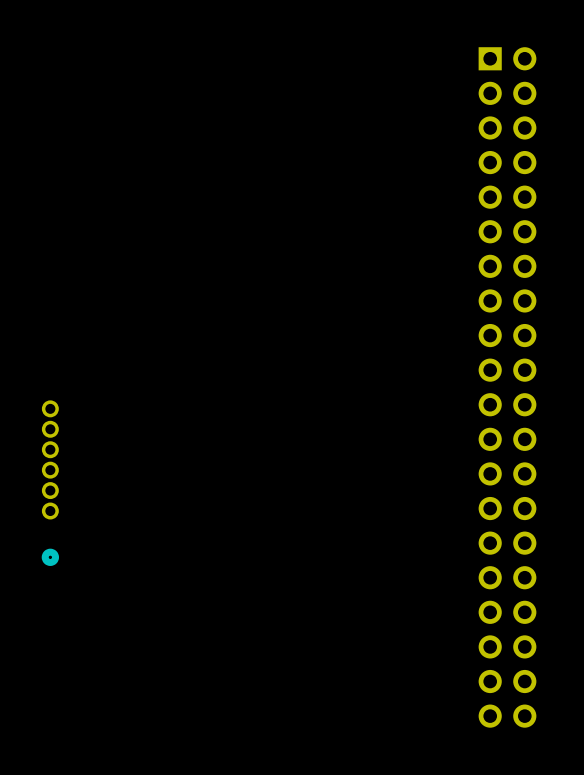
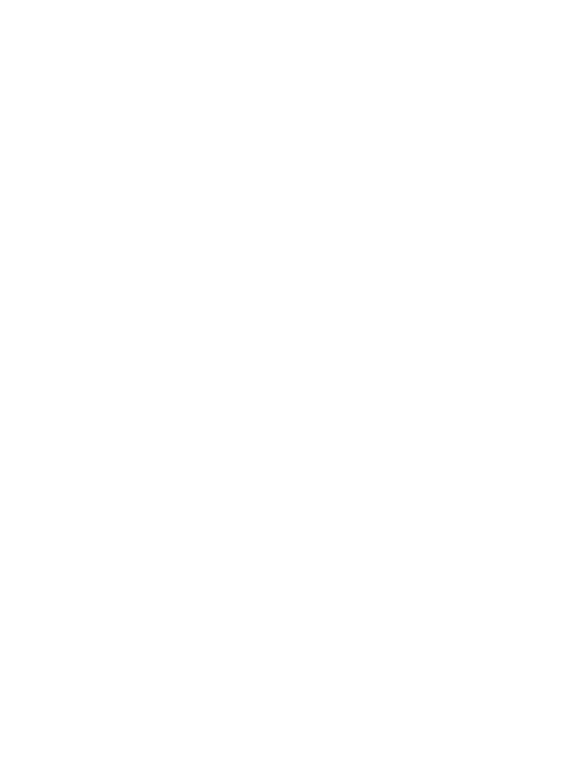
part: (507, 387) -> none
part: (50, 483) -> none

